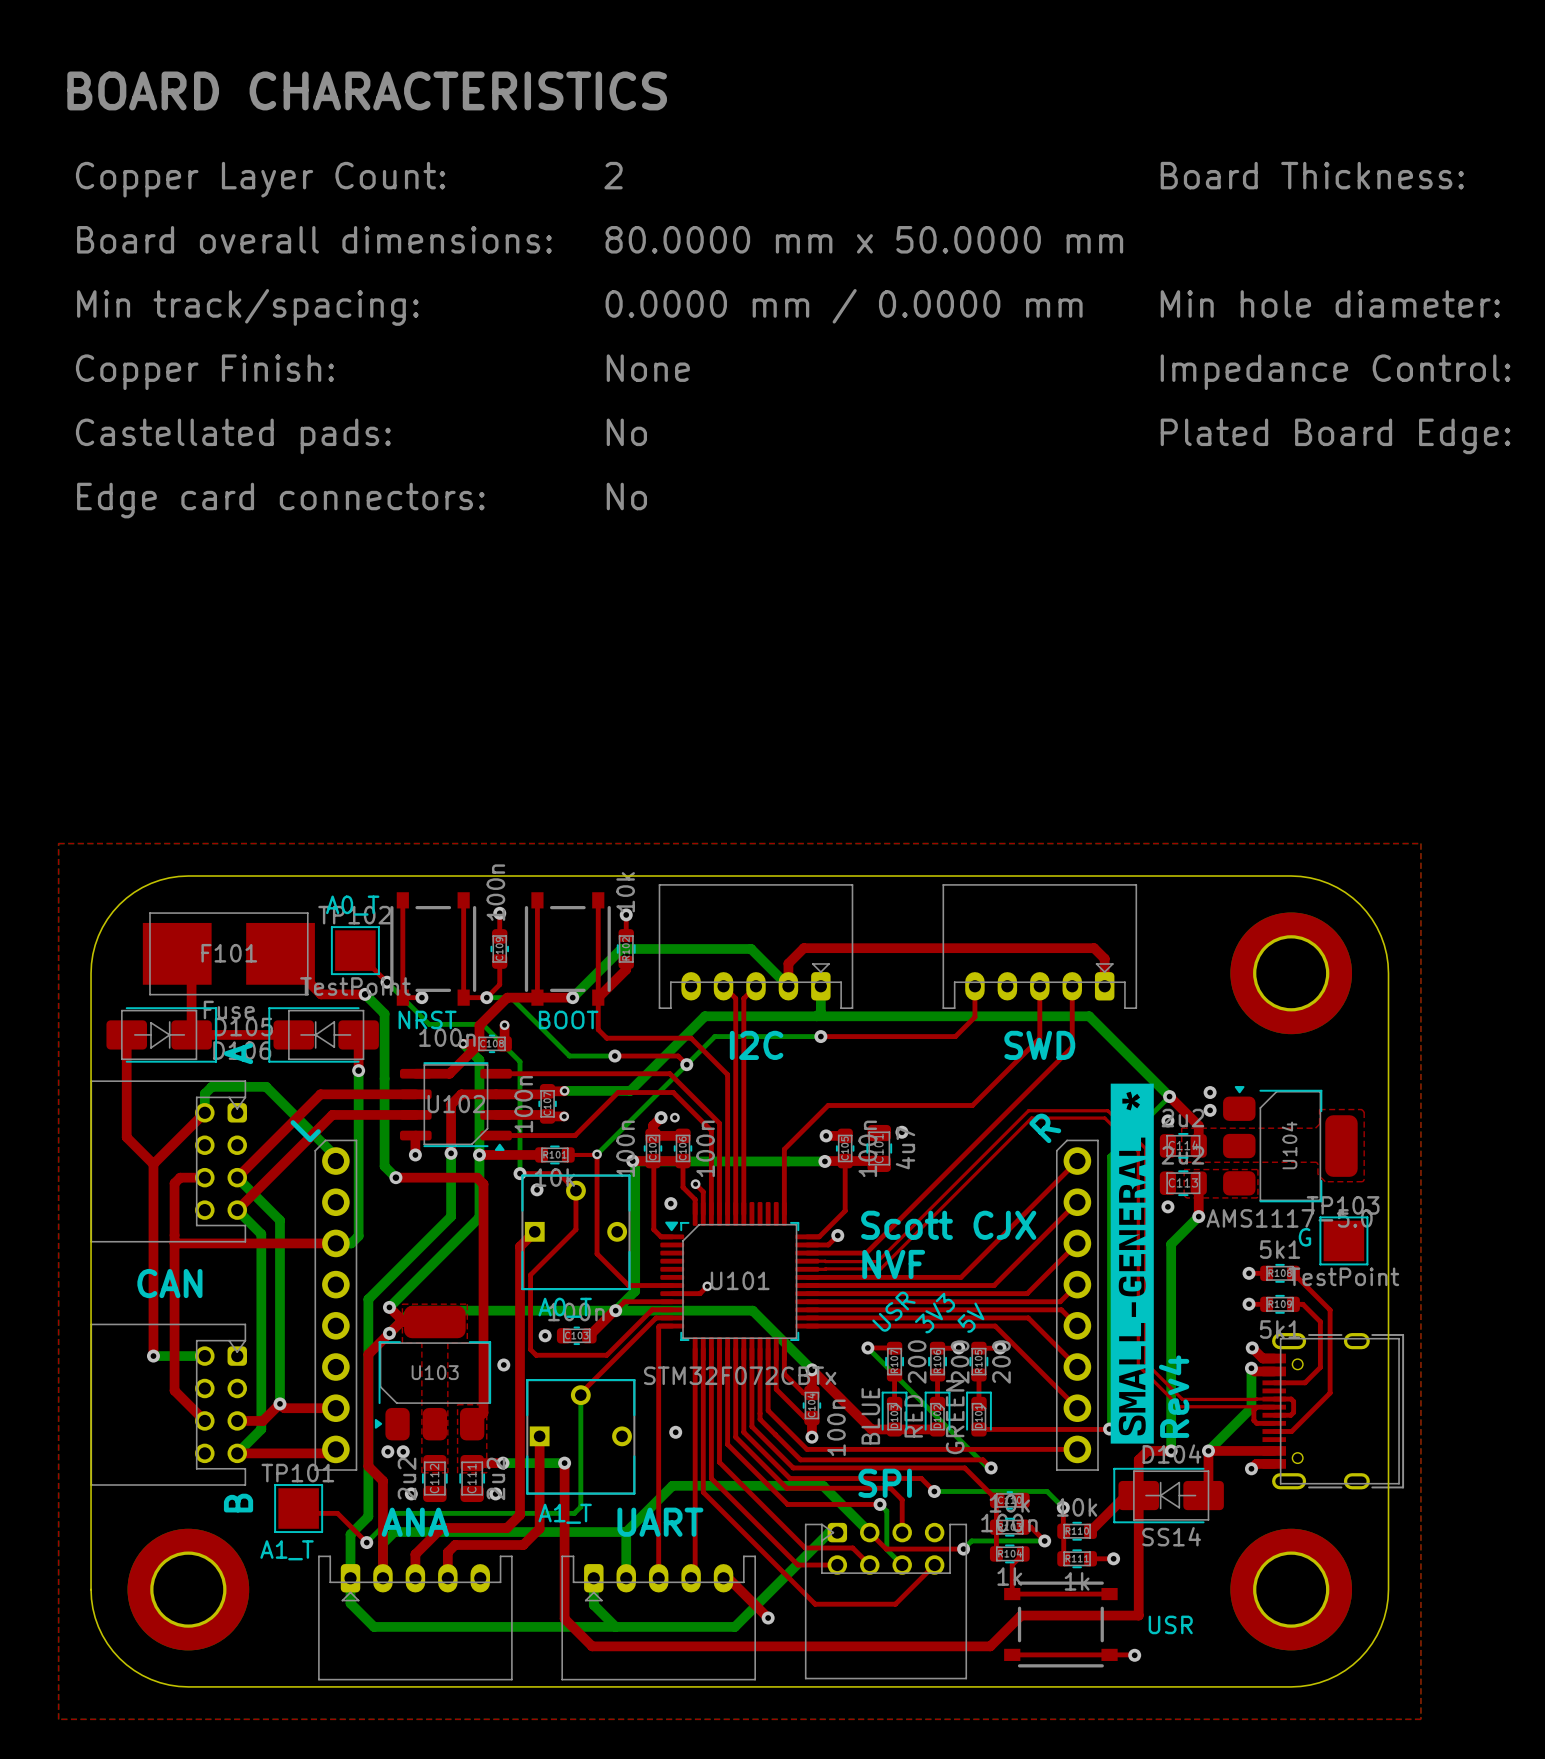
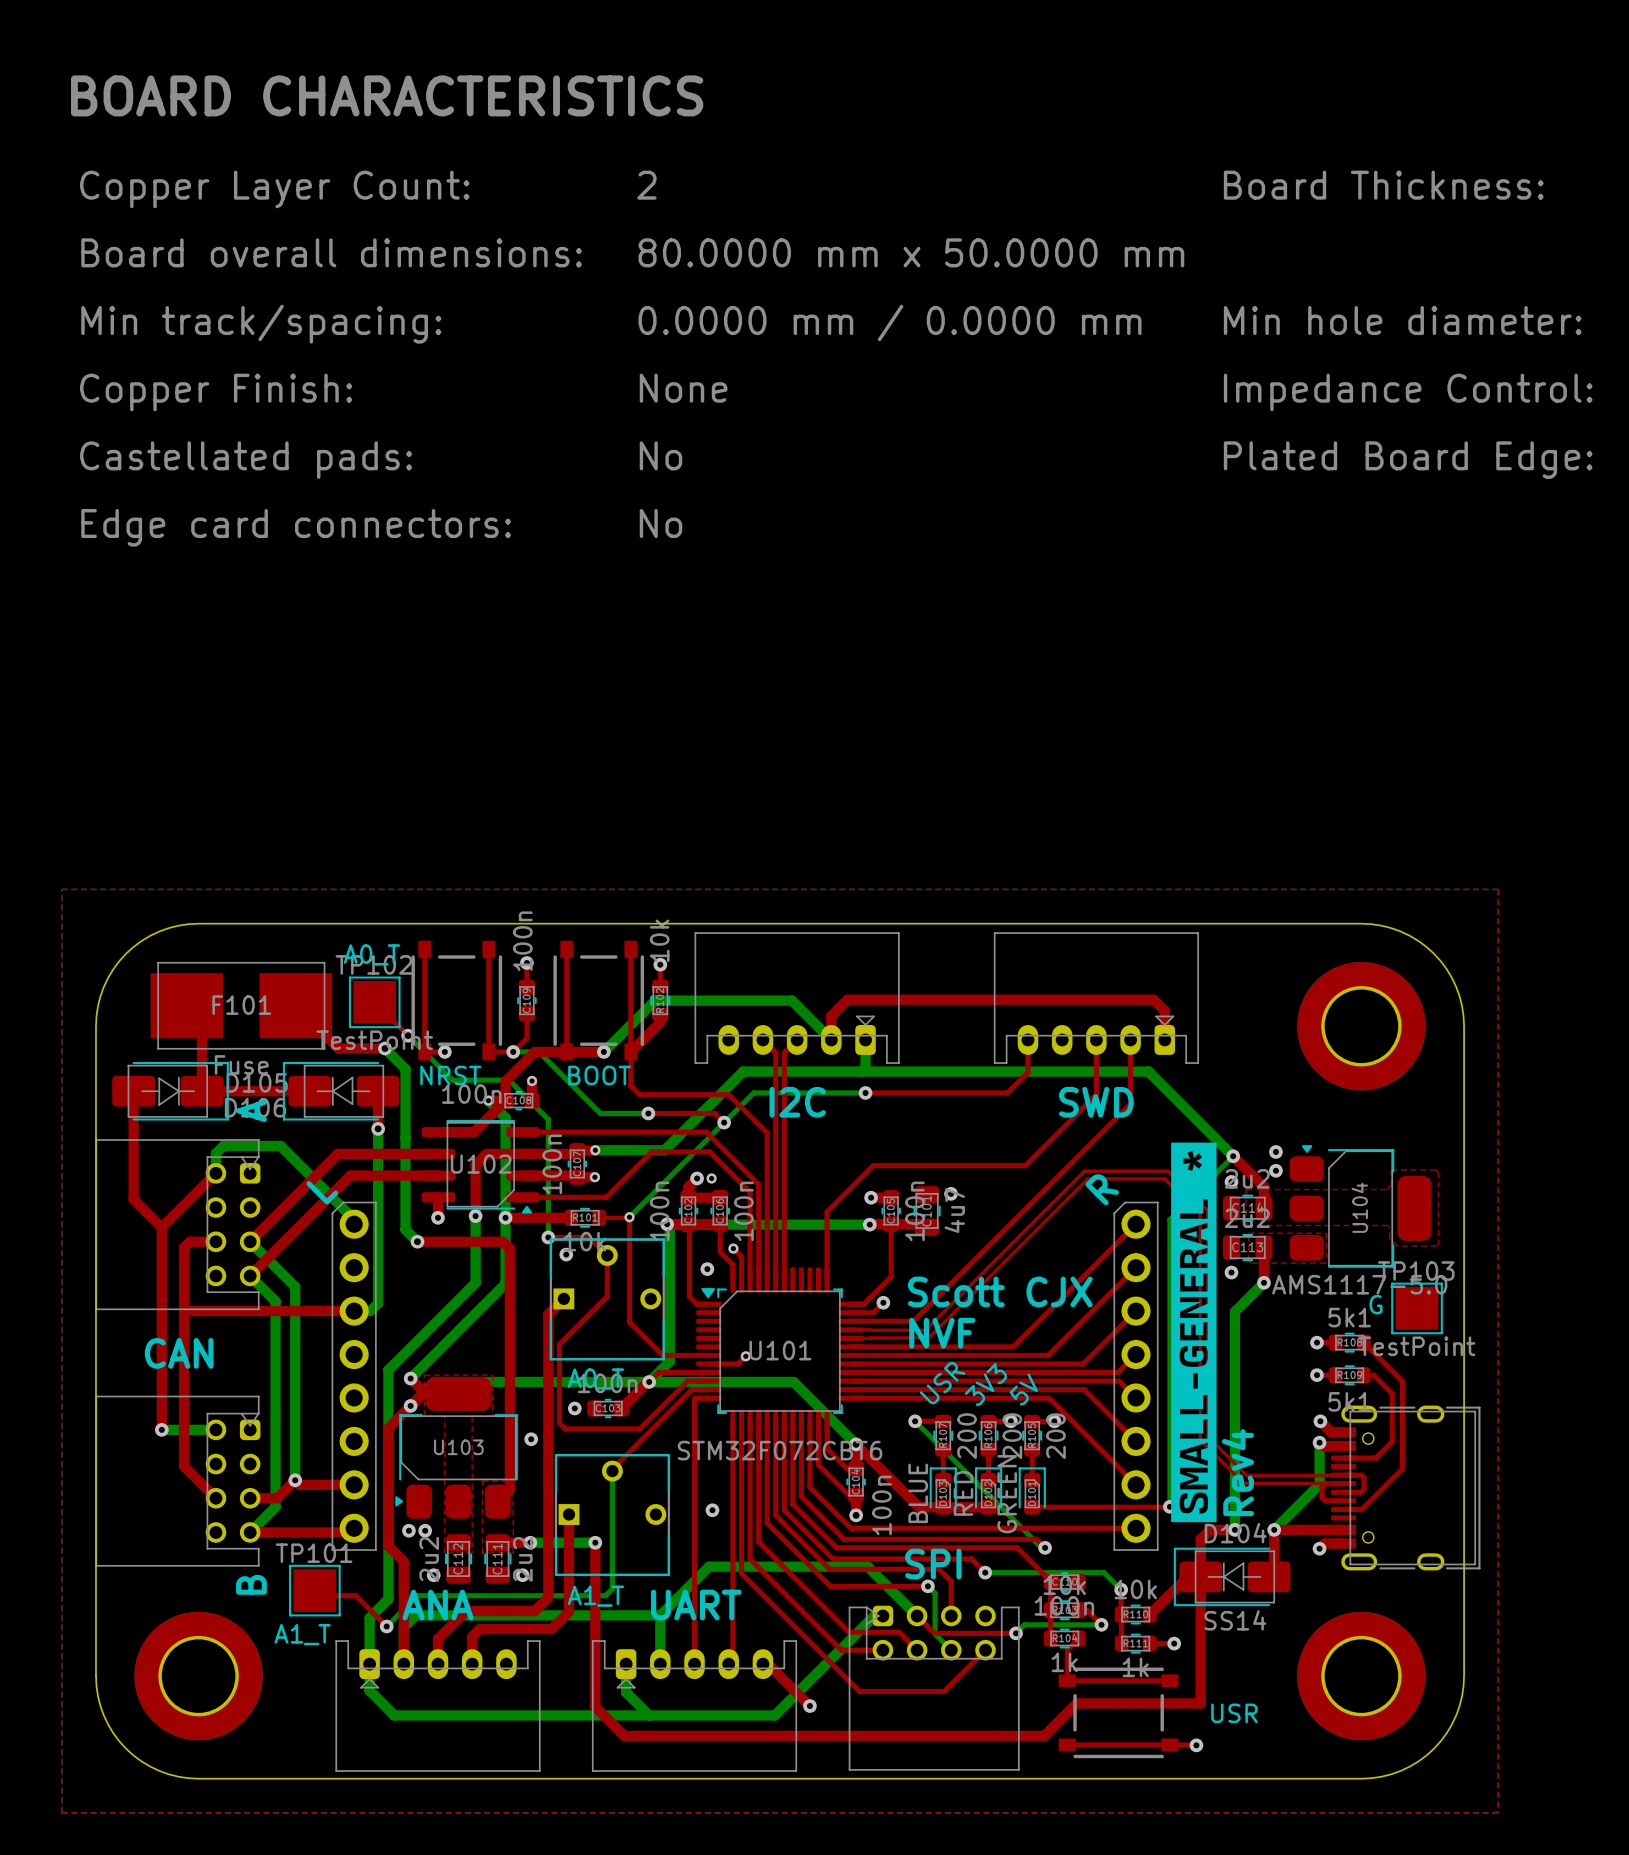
U101 value: STM32F072CBTx (740, 1375) -> STM32F072CBT6 (780, 1450)

